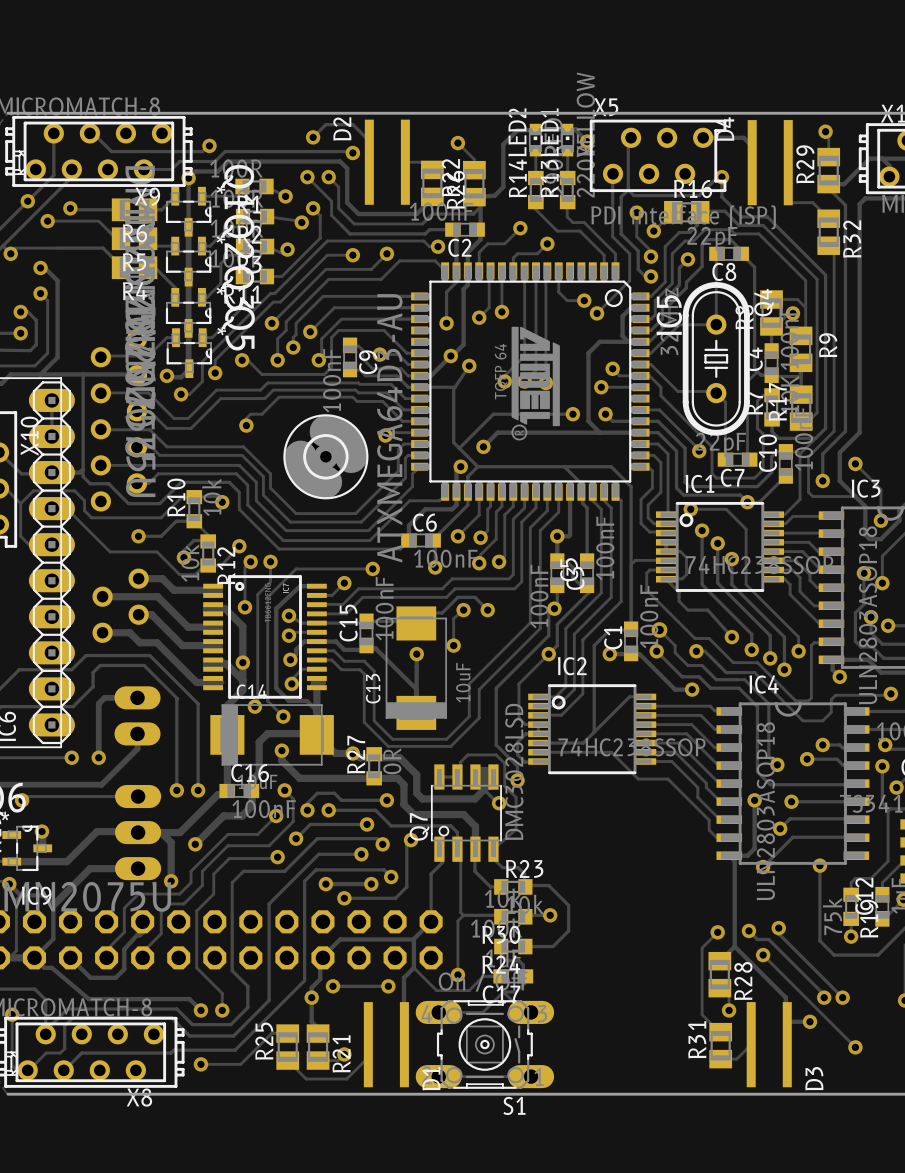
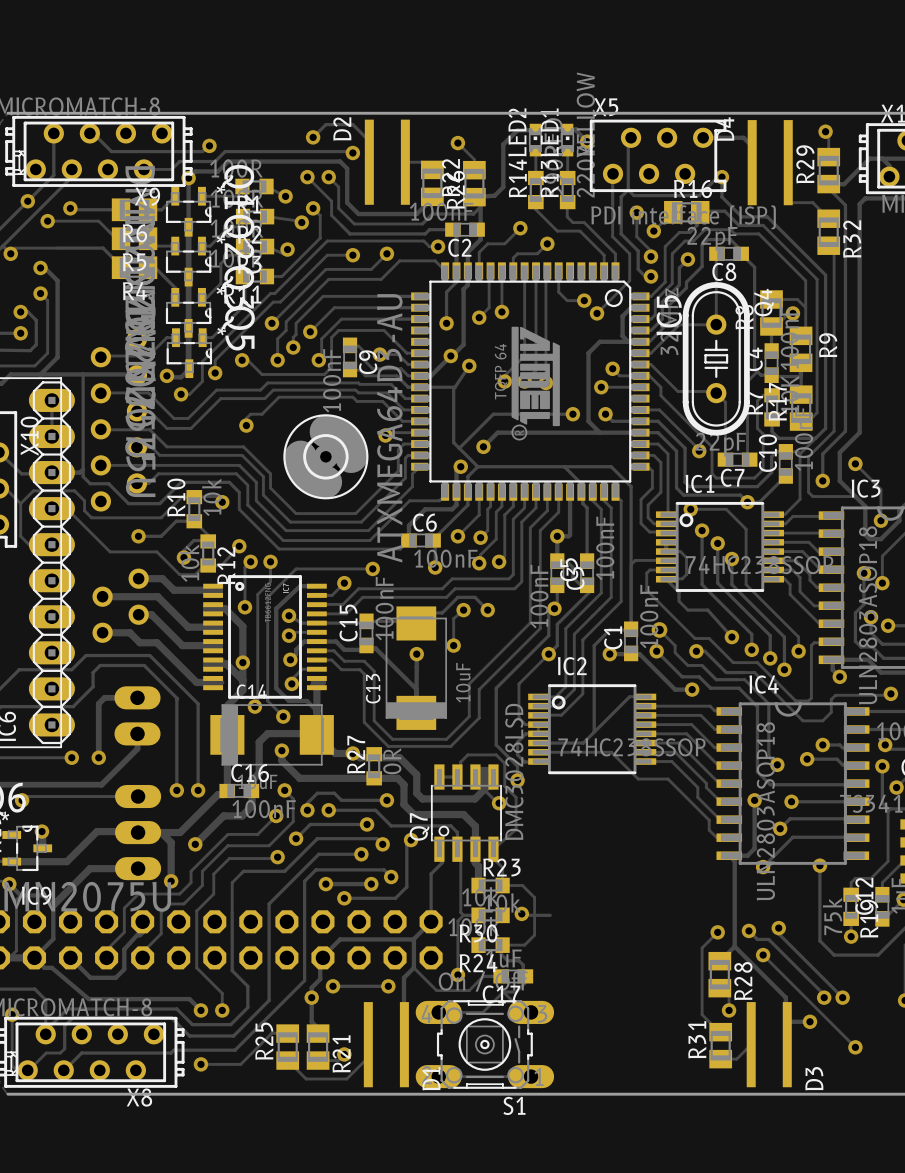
track: (474, 862) (474, 871) (490, 886) (501, 886) -> (474, 862) (478, 866) (478, 885)
track: (502, 867) (518, 867) (524, 874) (524, 886) (525, 886) (522, 885) (548, 885) (568, 905) (568, 930) (553, 946) (524, 945) -> (502, 867) (502, 885) (522, 885) (534, 897) (534, 935) (524, 945) (502, 945)
R23 position: (513, 886) -> (490, 885)
track: (478, 915) (501, 916) -> none
via position: (550, 915) -> (521, 913)
R30 position: (513, 916) -> (490, 915)
R24 position: (513, 946) -> (490, 945)

